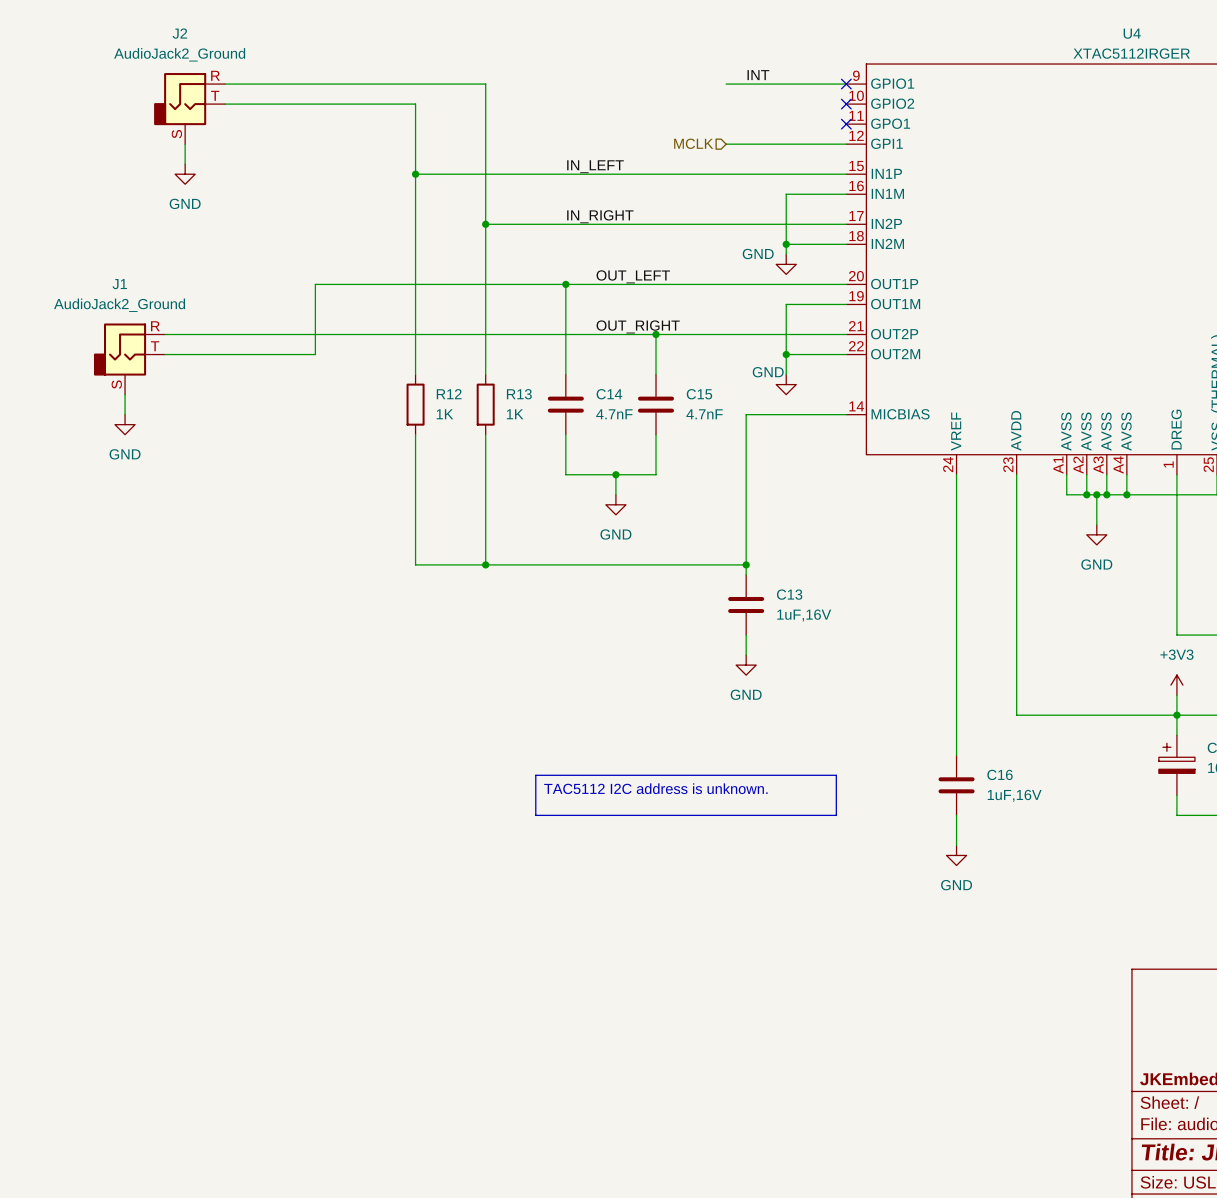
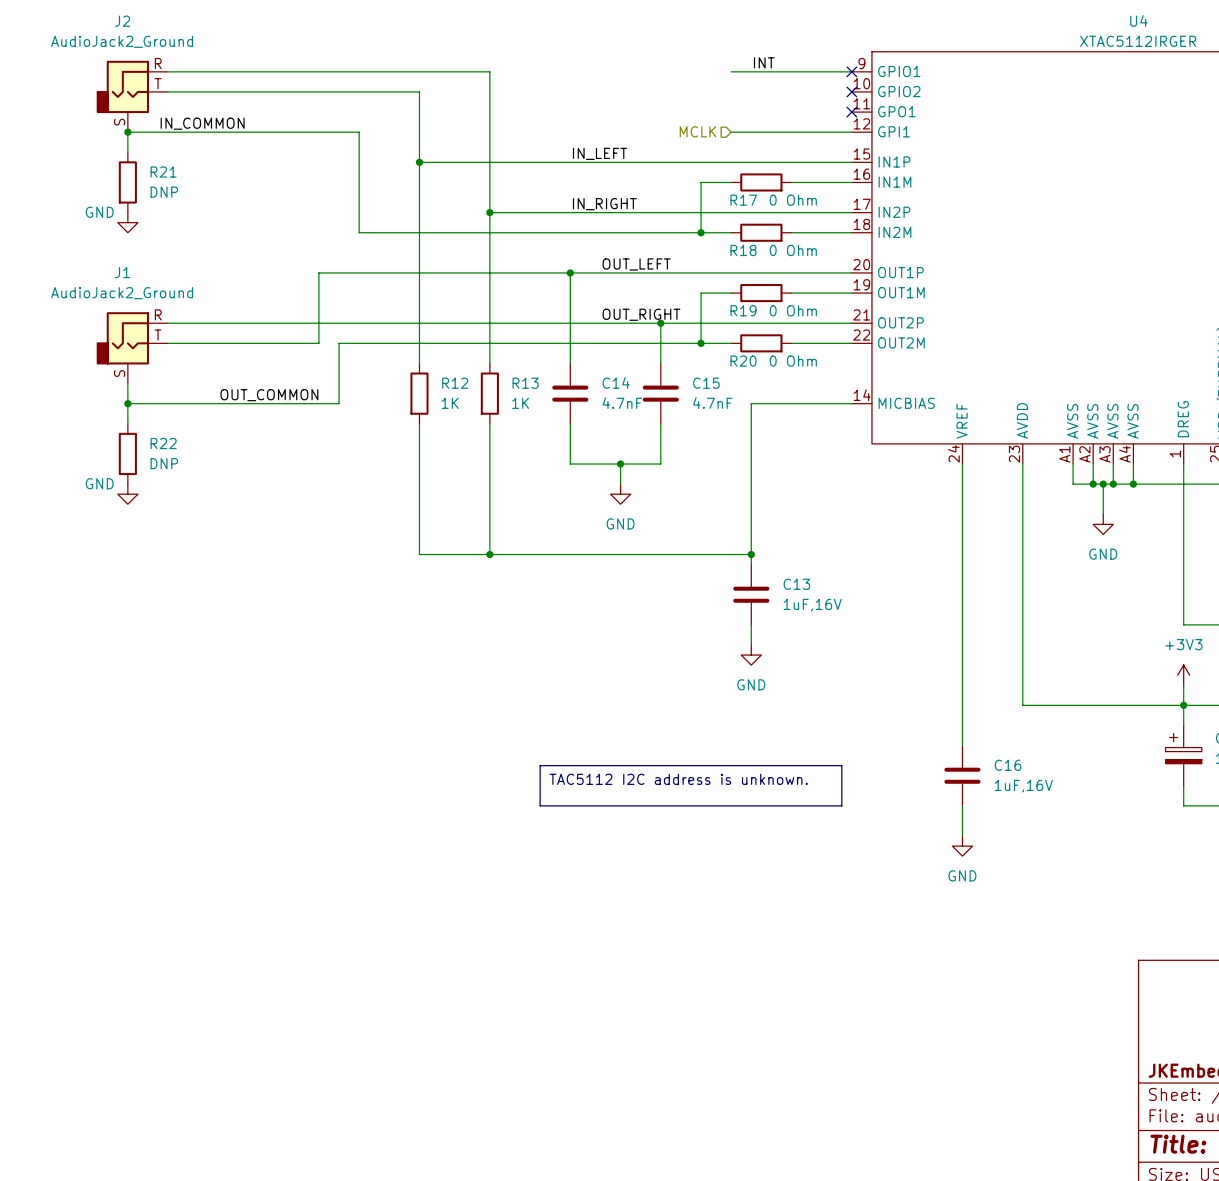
J2 position: (189, 108) -> (132, 96)
label: none -> IN_COMMON (202, 123)
junction: none -> (127, 132)
wire: (185, 144) (185, 164) -> none
wire: none -> (127, 152) (127, 132) (359, 132) (359, 232) (731, 232)
power symbol position: GND (185, 174) -> GND (127, 222)
R21: none -> DNP (127, 182)
wire: none -> (731, 182) (701, 182) (701, 232)
R17: none -> 0 Ohm (761, 182)
wire: (786, 194) (786, 254) -> none
power symbol text position: GND (185, 203) -> GND (99, 212)
junction: none -> (701, 232)
R18: none -> 0 Ohm (761, 232)
junction: (786, 244) -> none
power symbol: GND (786, 264) -> none
wire: none -> (731, 293) (701, 293) (701, 343)
R19: none -> 0 Ohm (761, 293)
wire: (786, 304) (786, 374) -> none
junction: none -> (701, 343)
wire: none -> (731, 343) (339, 343) (339, 403) (127, 403) (127, 423)
R20: none -> 0 Ohm (761, 343)
junction: (786, 354) -> none
power symbol: GND (786, 384) -> none
label: none -> OUT_COMMON (269, 395)
junction: none -> (127, 403)
power symbol position: GND (125, 424) -> GND (127, 494)
power symbol text position: GND (125, 454) -> GND (99, 483)
R22: none -> DNP (127, 453)

